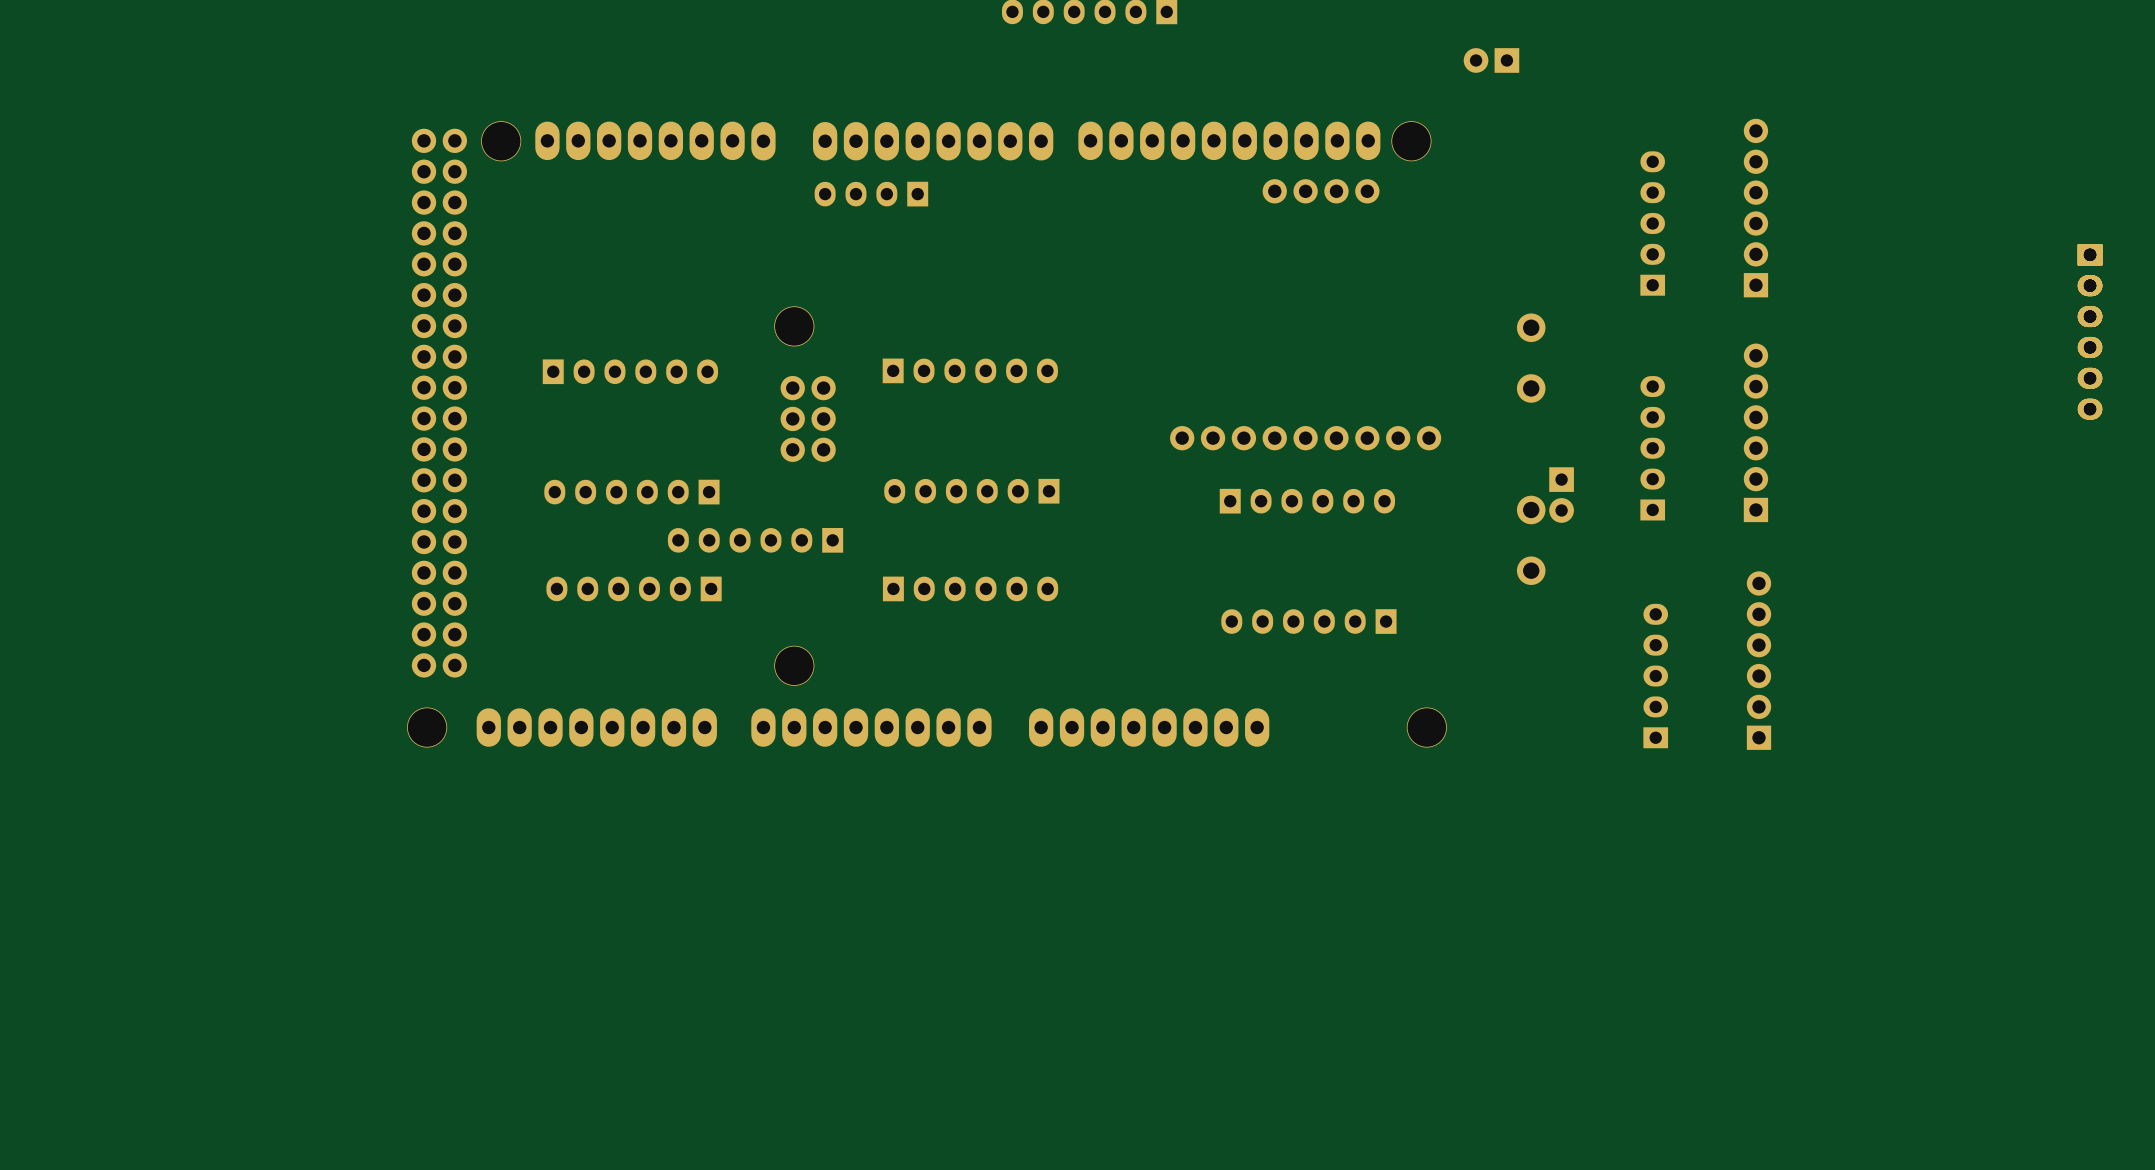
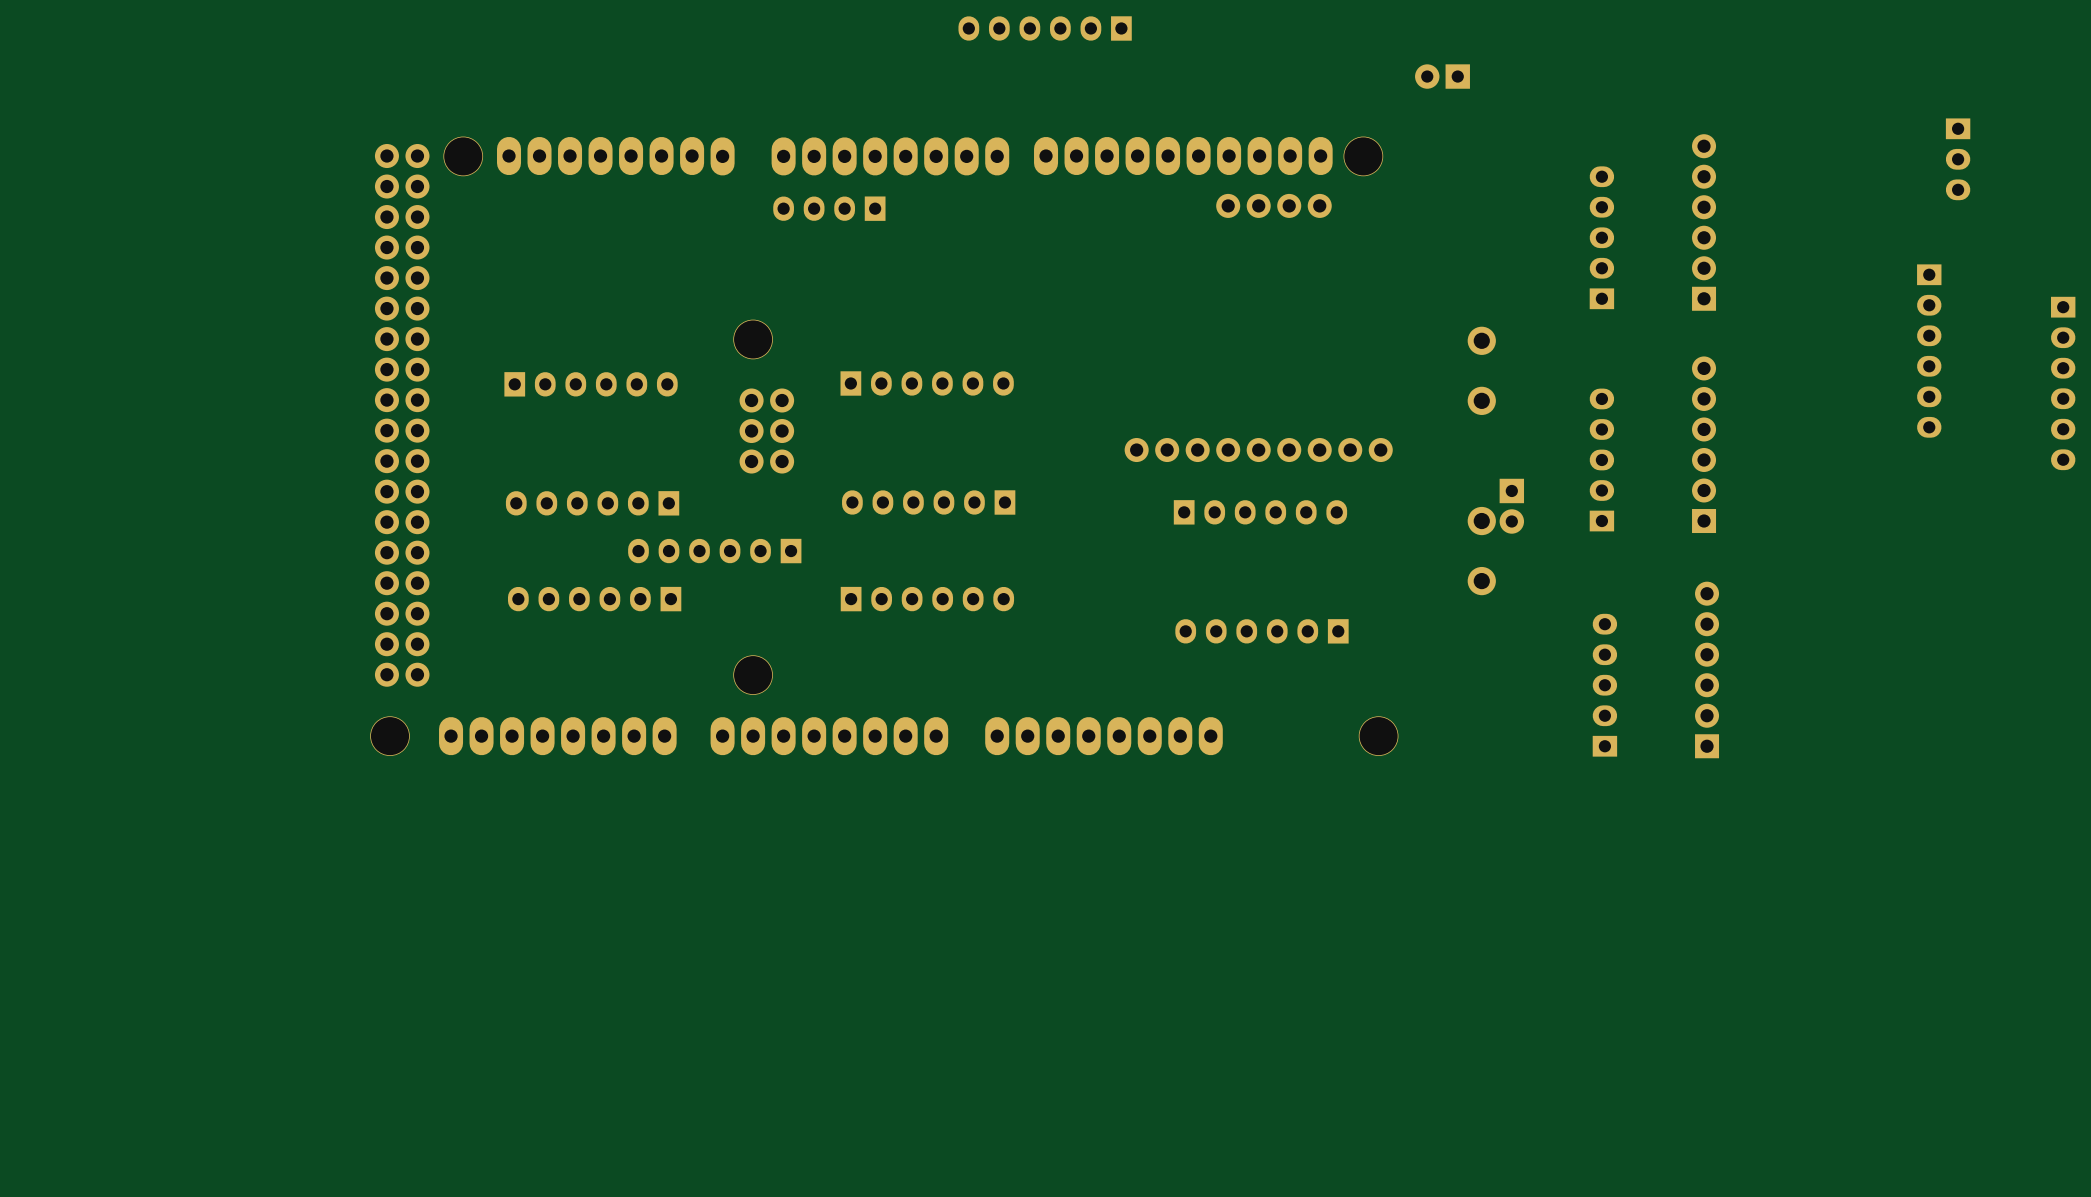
part position: (2090, 285) -> (1958, 159)
part position: (2090, 331) -> (2063, 383)
part: none -> (1929, 351)

